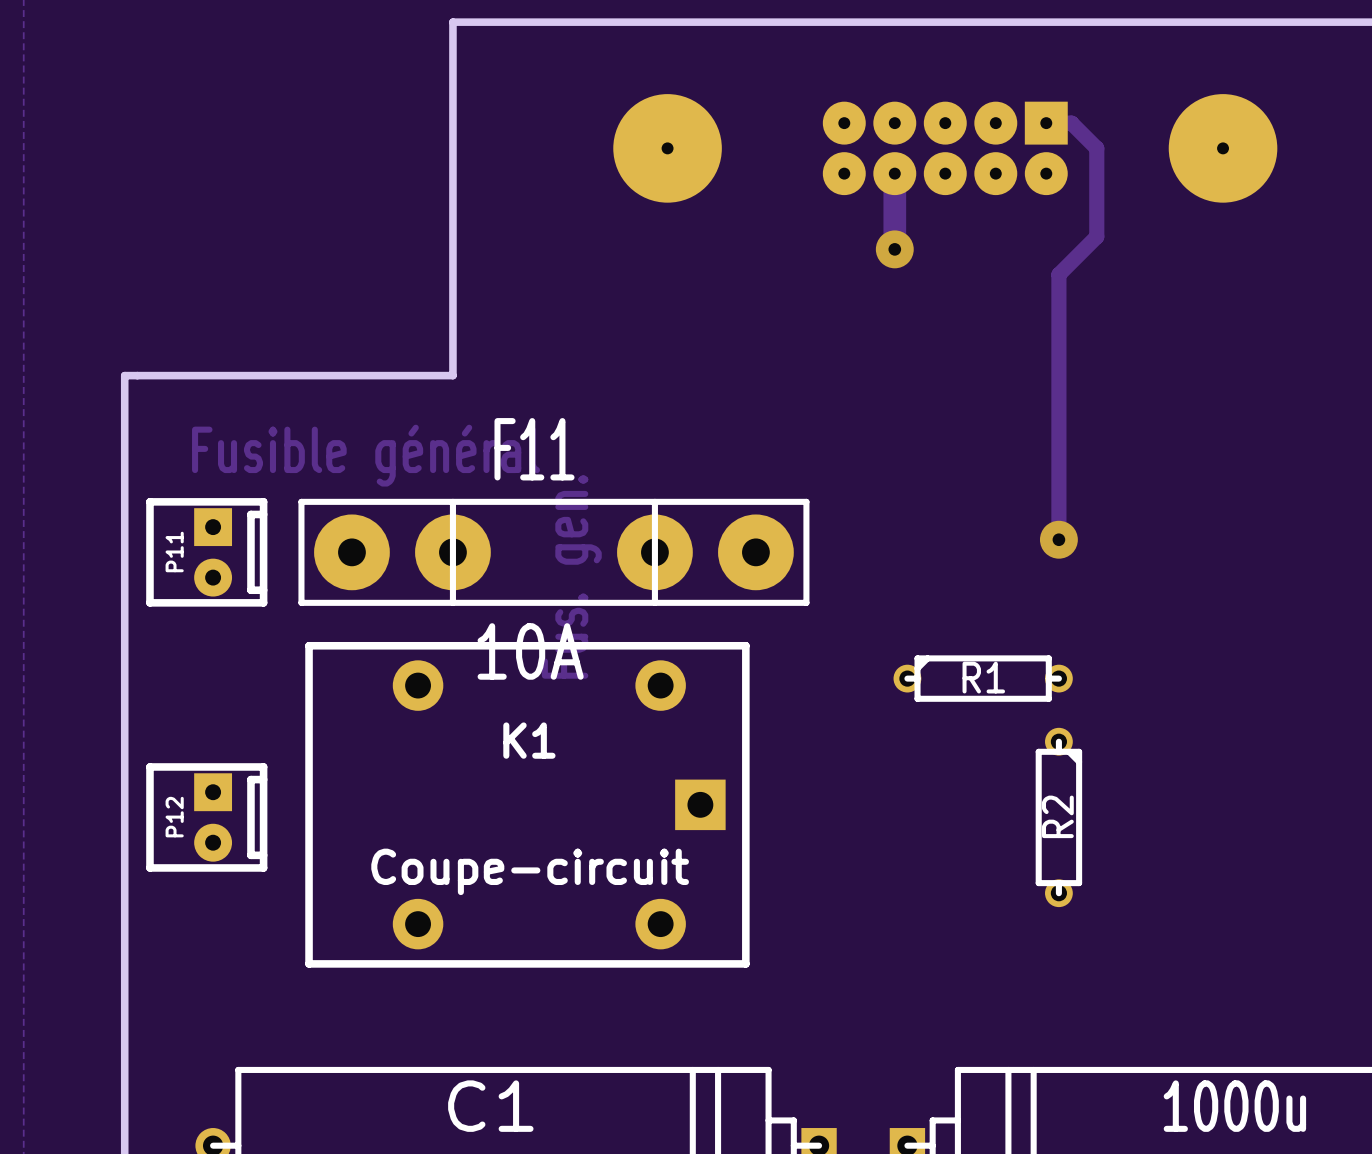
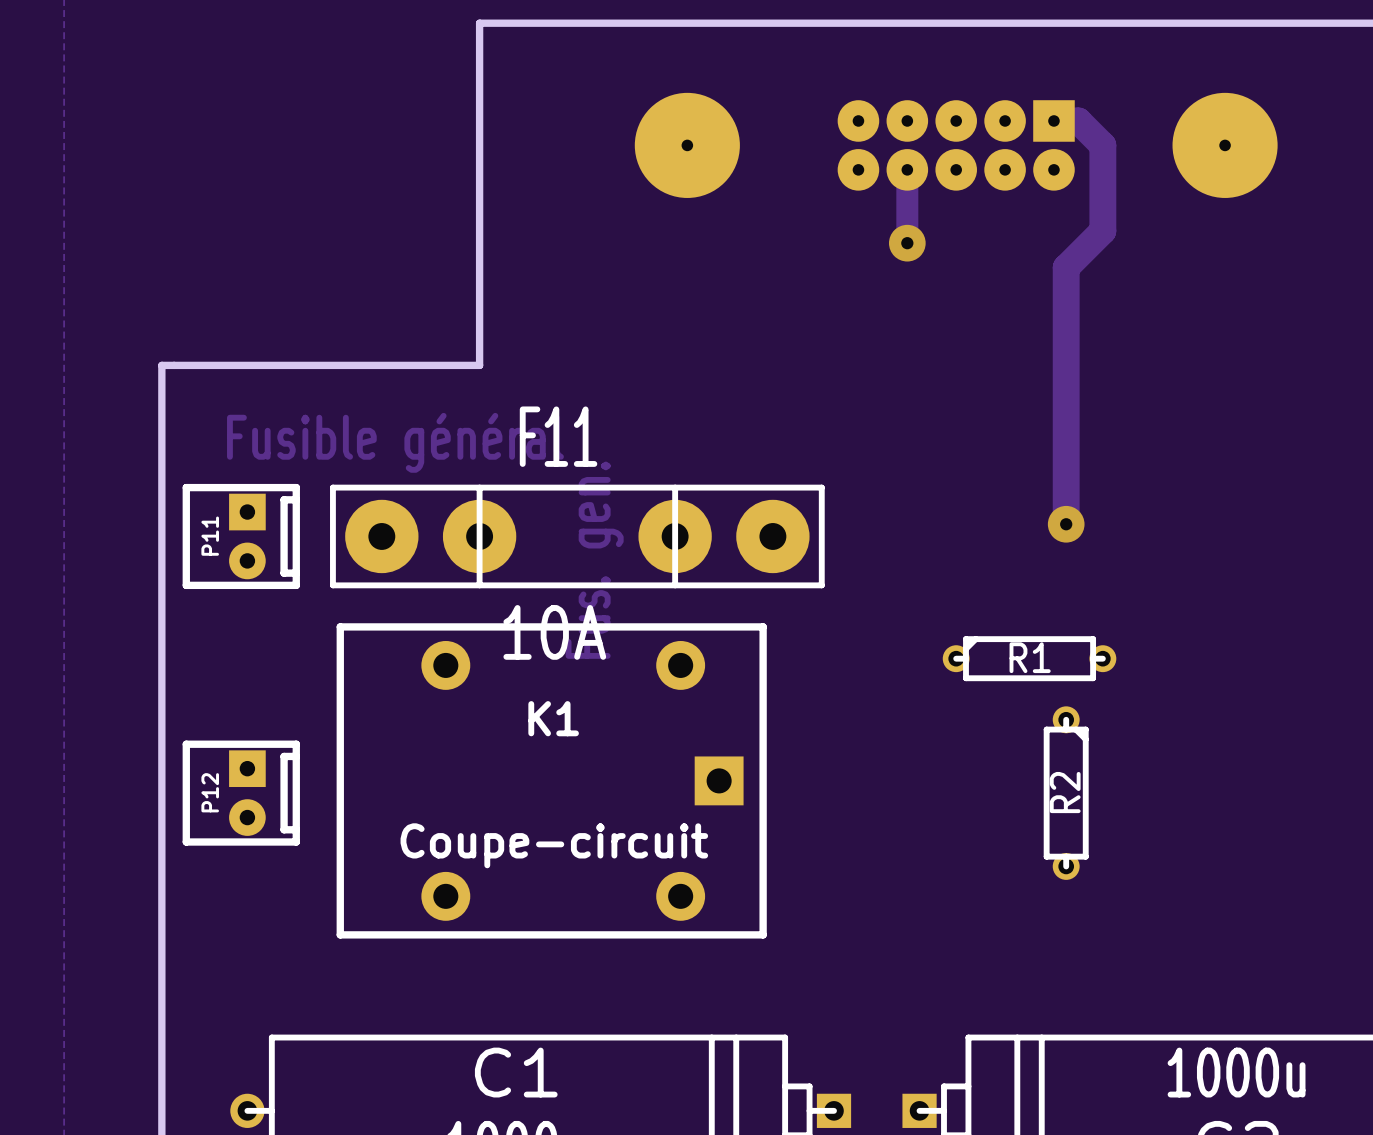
track width: thin (1046, 123) (1071, 123) (1096, 148) (1096, 236) (1058, 274) (1058, 539) -> thick (1053, 120) (1078, 120) (1102, 145) (1102, 230) (1066, 267) (1066, 524)
R1 position: (983, 678) -> (1029, 658)

